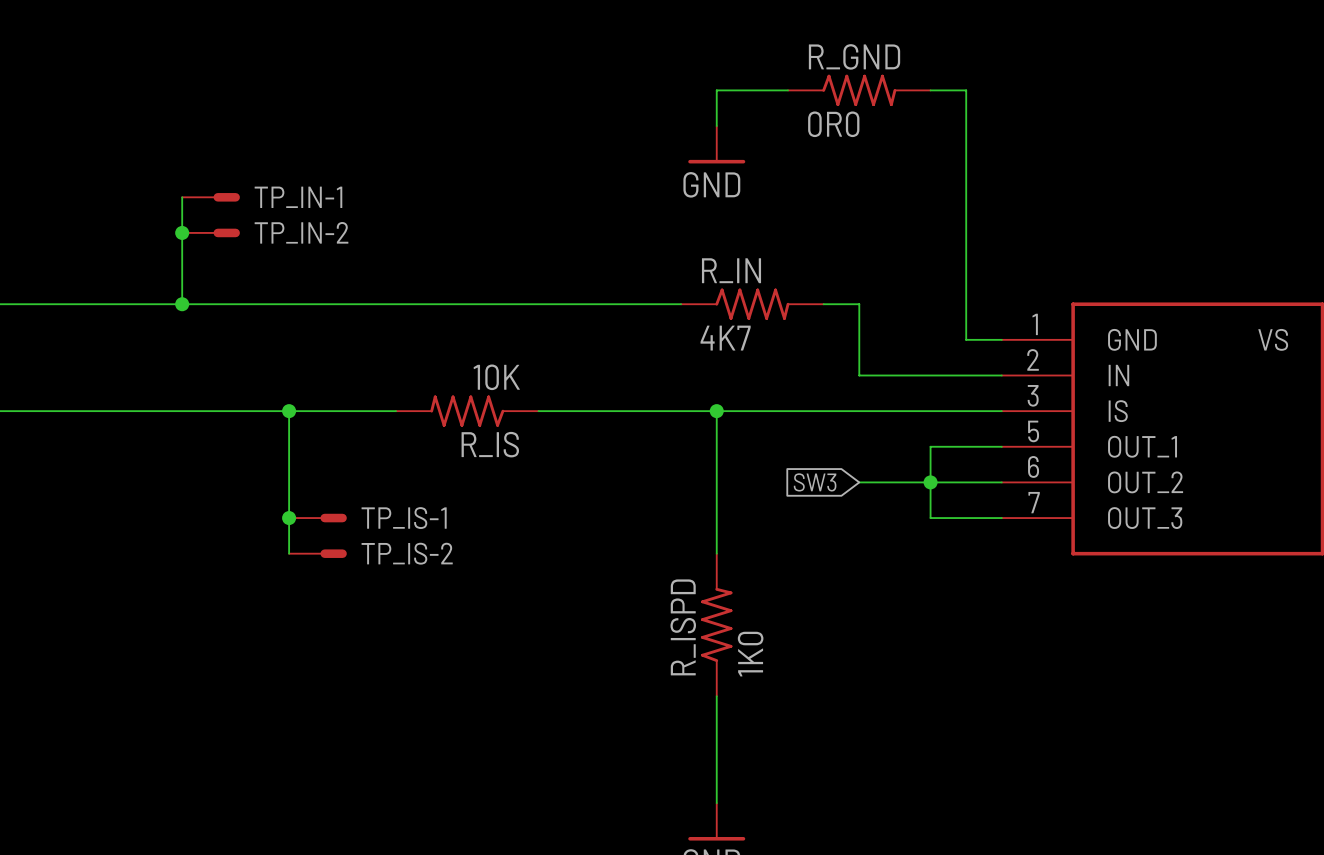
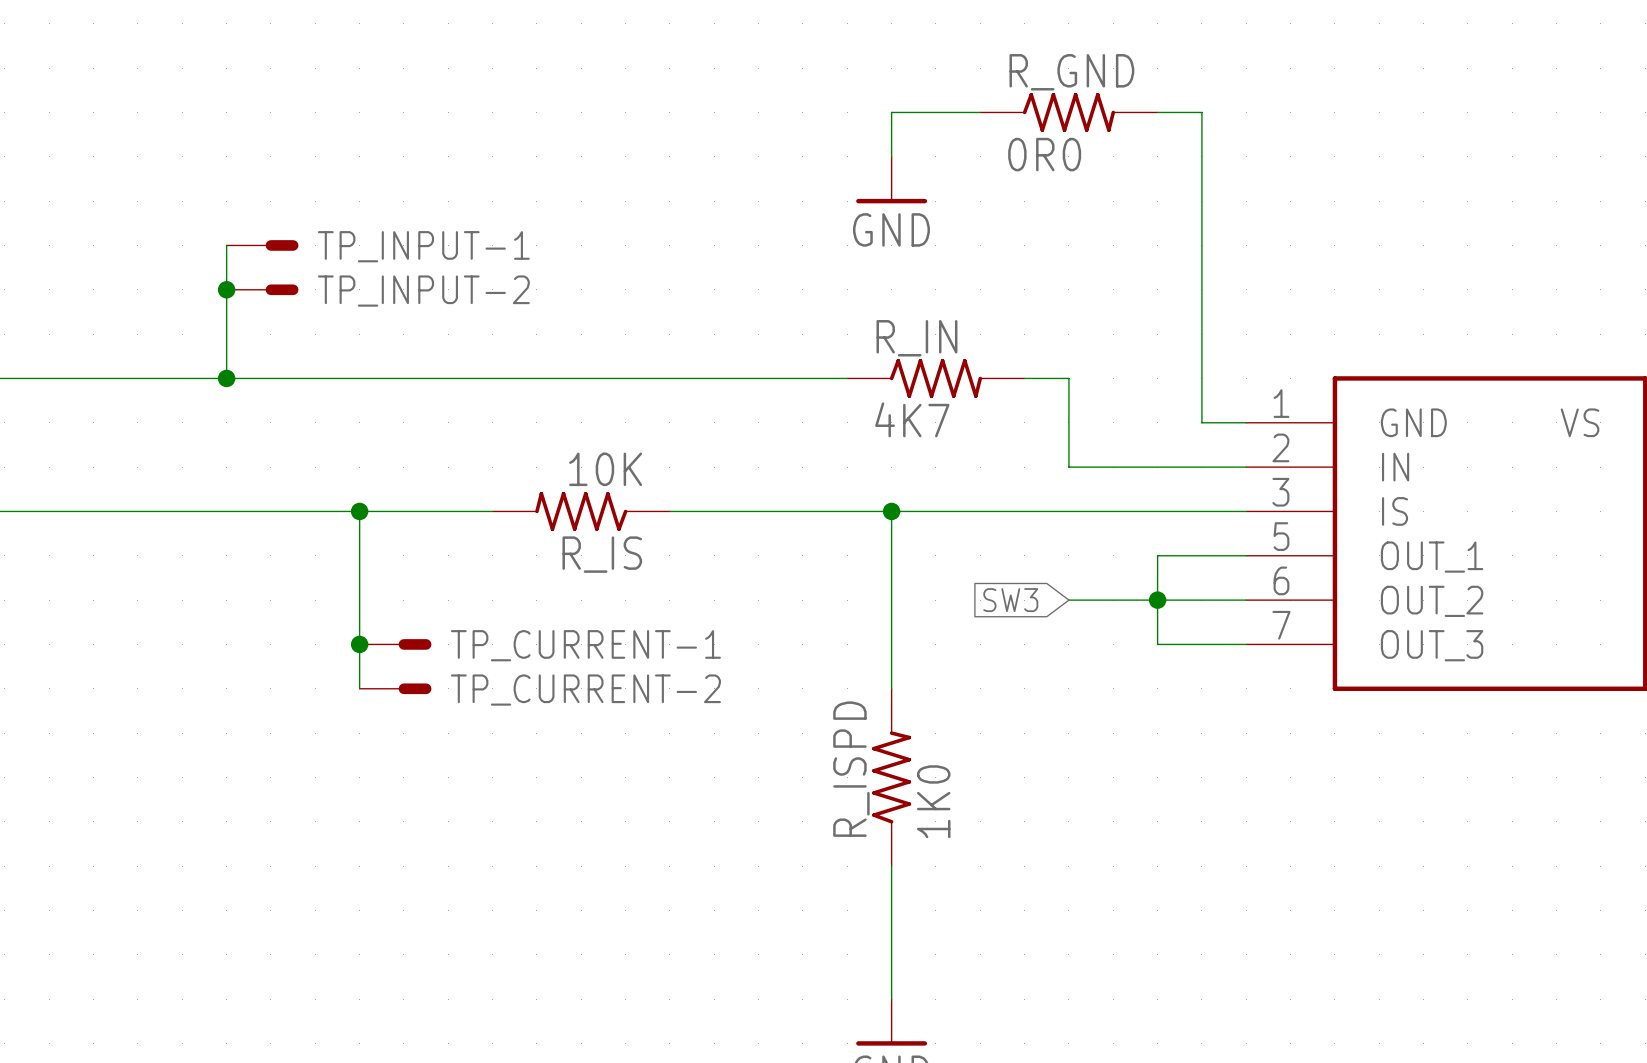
TP_IN-1 name: TP_IN-1 (298, 197) -> TP_INPUT-1 (423, 246)
TP_IN-2 name: TP_IN-2 (301, 232) -> TP_INPUT-2 (423, 291)
TP_IS-1 name: TP_IS-1 (404, 518) -> TP_CURRENT-1 (585, 645)
TP_IS-2 name: TP_IS-2 (407, 553) -> TP_CURRENT-2 (585, 690)

